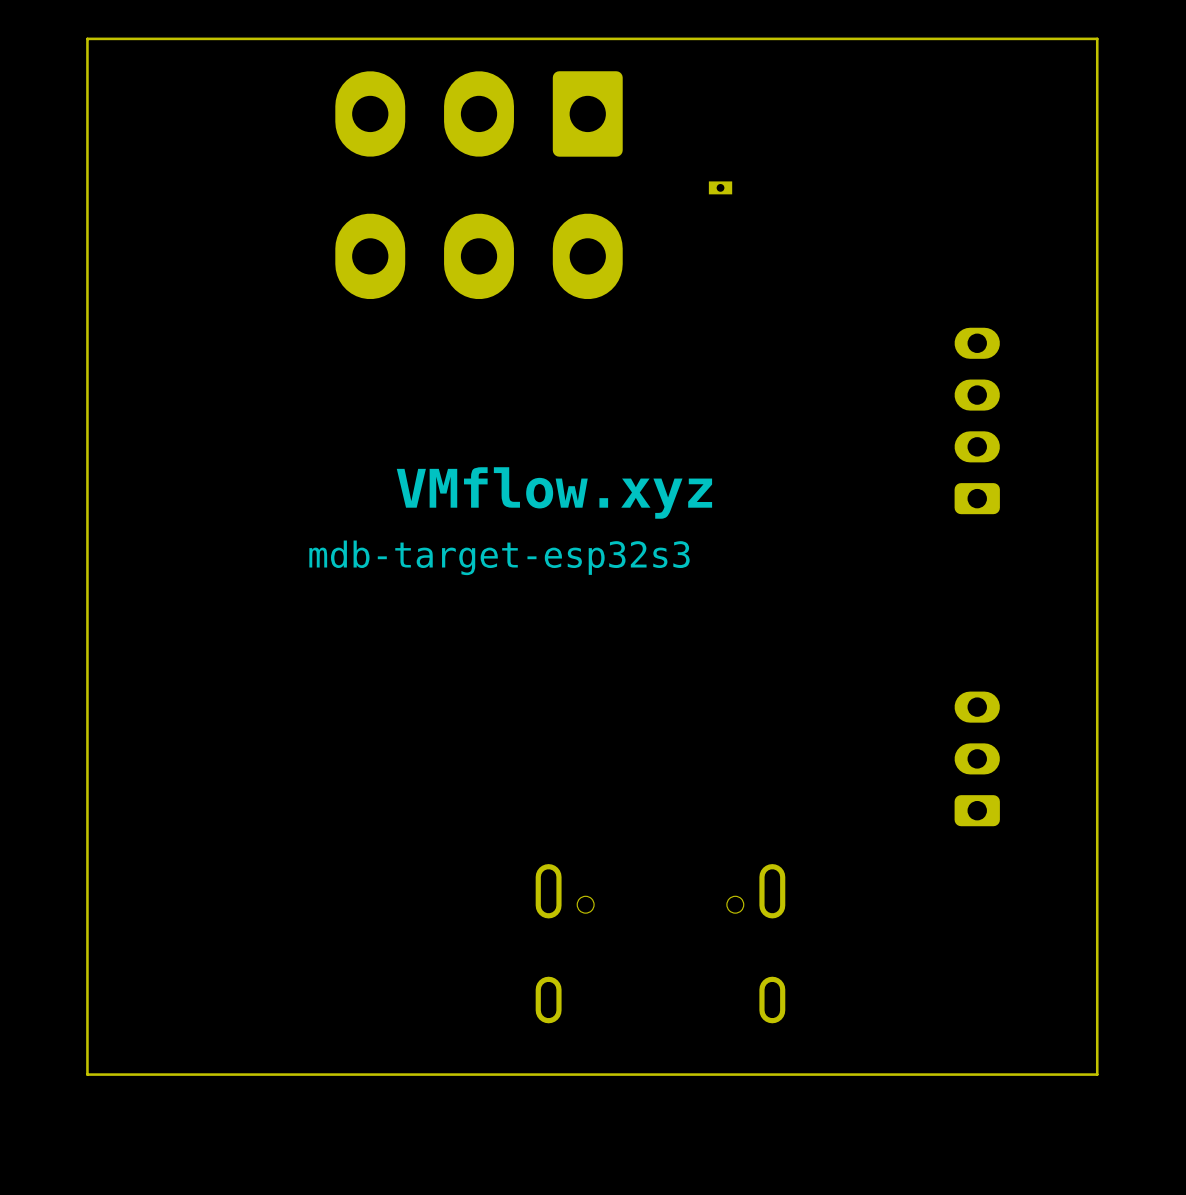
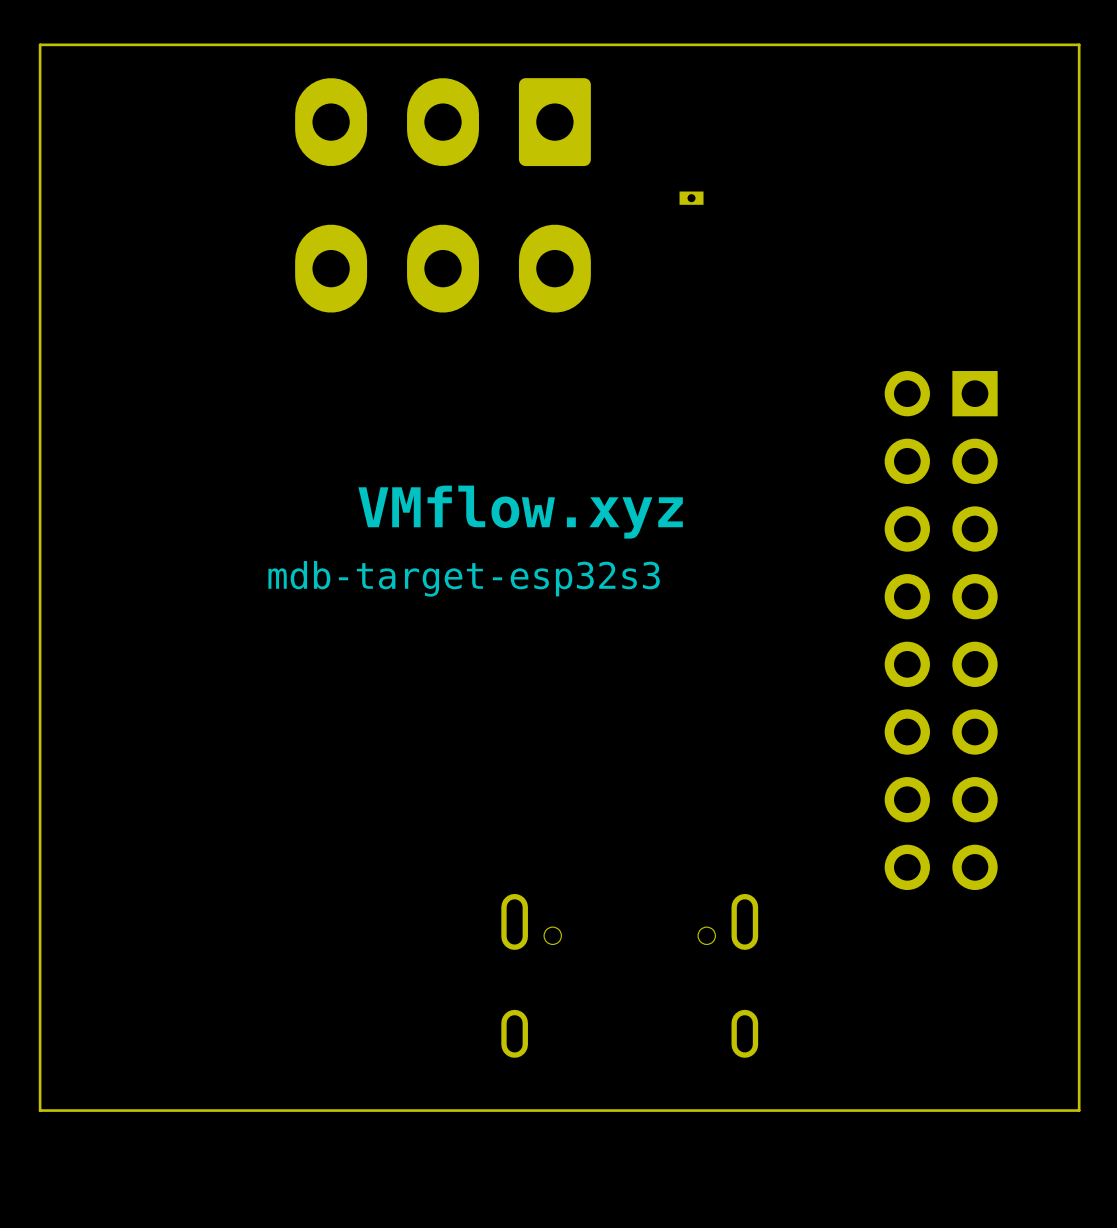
part: (977, 420) -> none
part: none -> (941, 630)
part: (977, 758) -> none

